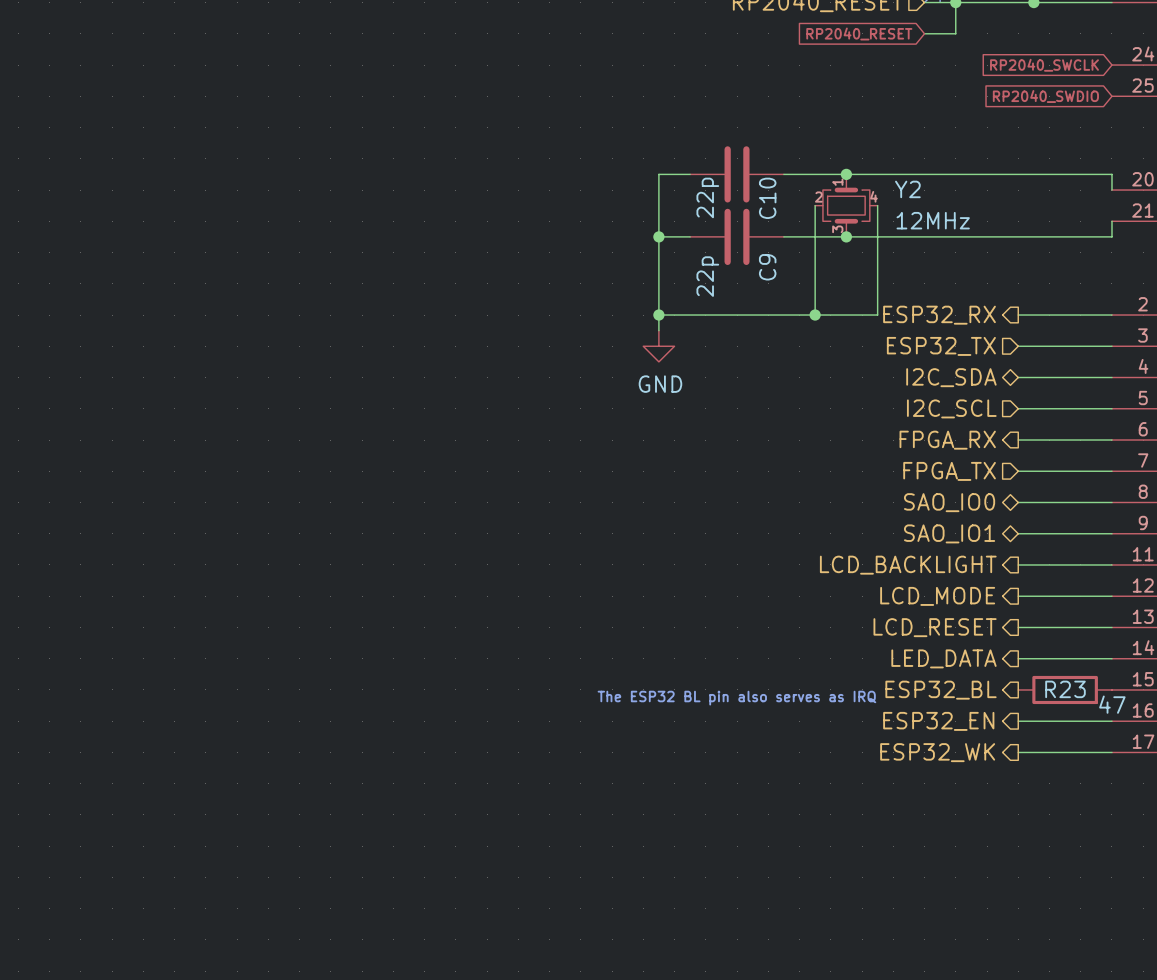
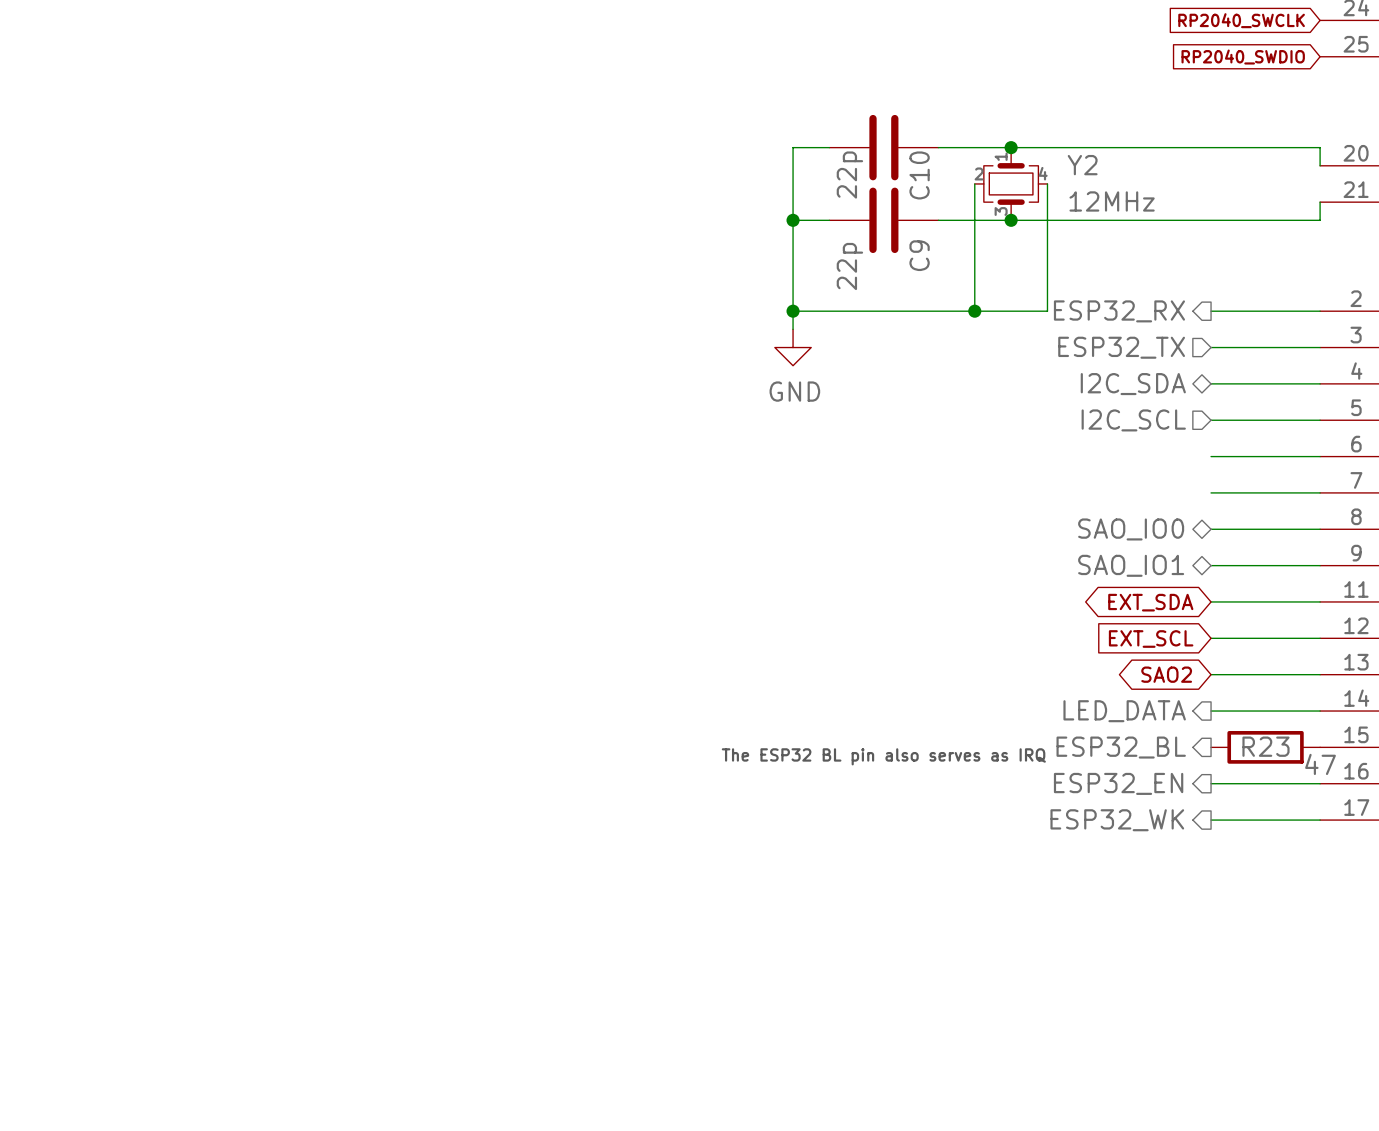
hierarchical label: FPGA_RX (947, 440) -> none
hierarchical label: FPGA_TX (949, 471) -> none
hierarchical label: LCD_BACKLIGHT (908, 565) -> none
global label: none -> EXT_SDA (1150, 602)
hierarchical label: LCD_MODE (937, 596) -> none
global label: none -> EXT_SCL (1151, 639)
hierarchical label: LCD_RESET (935, 627) -> none
global label: none -> SAO2 (1166, 674)

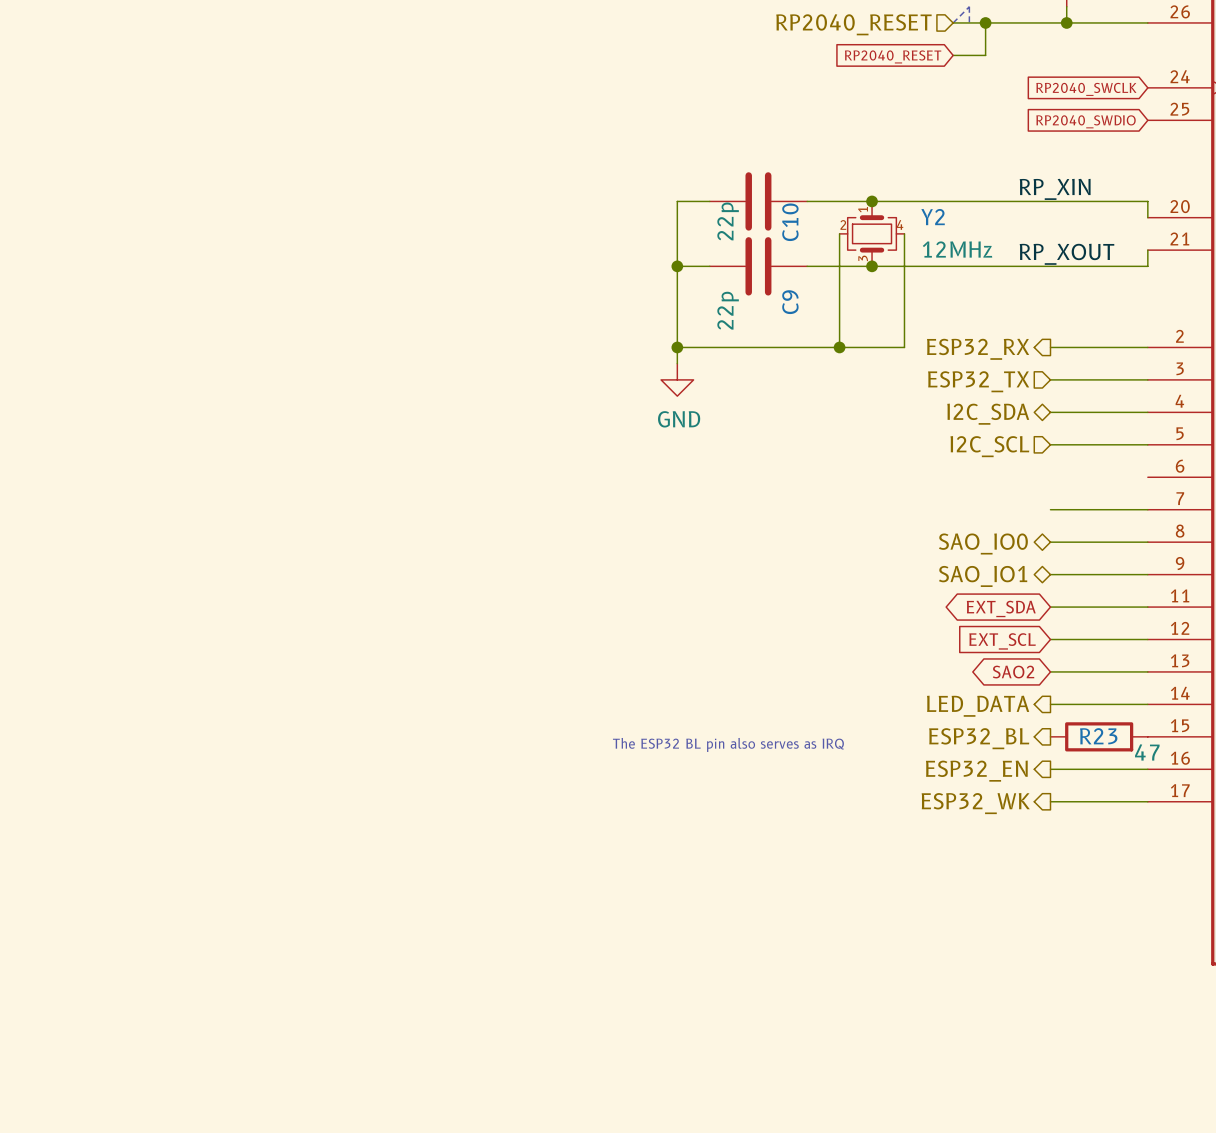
label: none -> RP_XIN (1055, 189)
label: none -> RP_XOUT (1066, 254)
wire: (1211, 456) (1320, 456) -> none

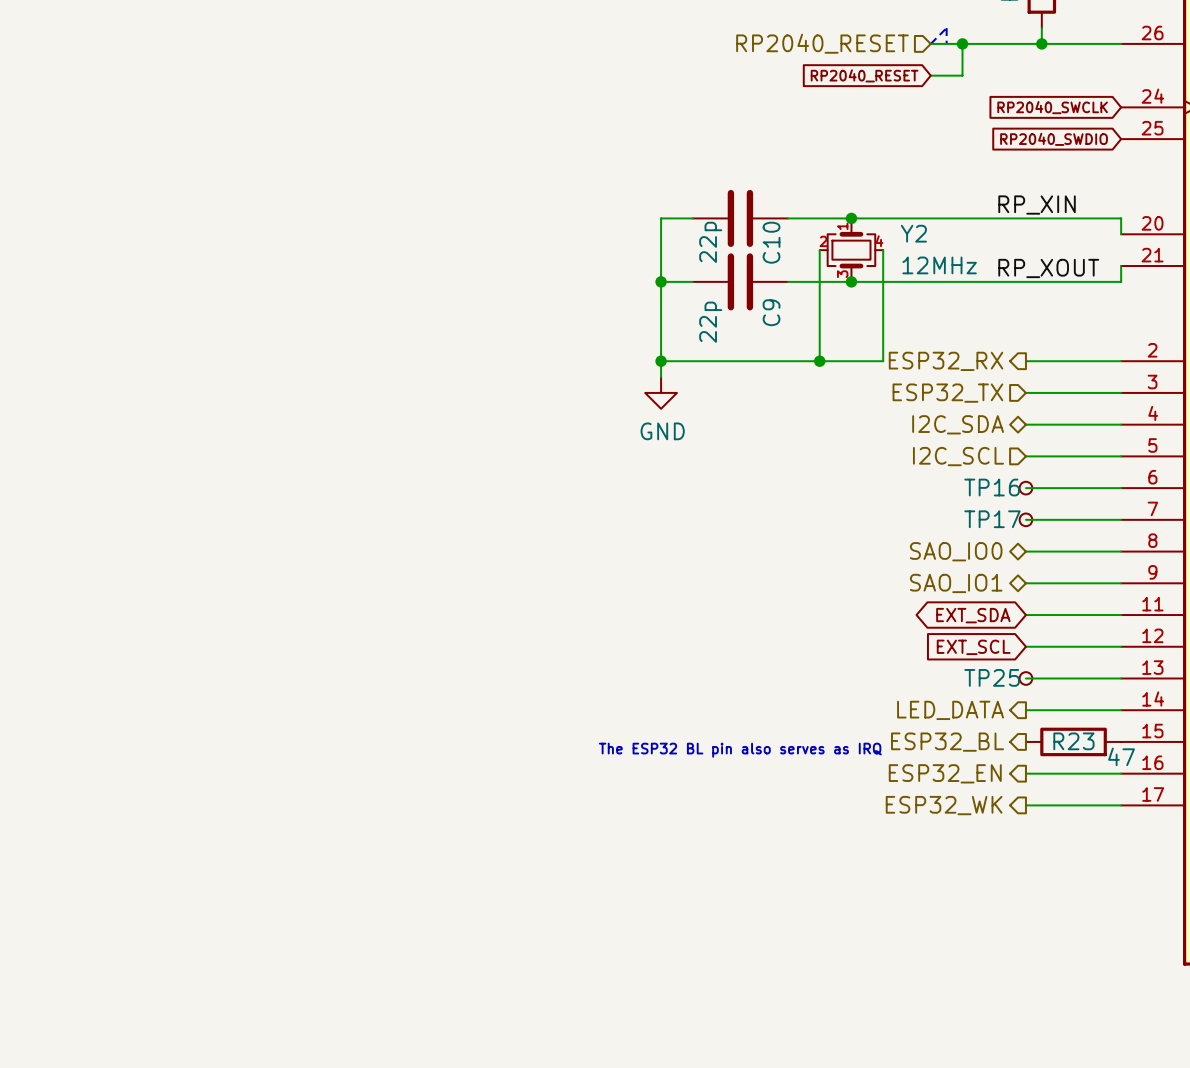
wire: none -> (1025, 488) (1121, 488)
TP16: none -> (1025, 488)
TP17: none -> (1025, 519)
TP25: none -> (1025, 678)
global label: SAO2 (1013, 672) -> none

